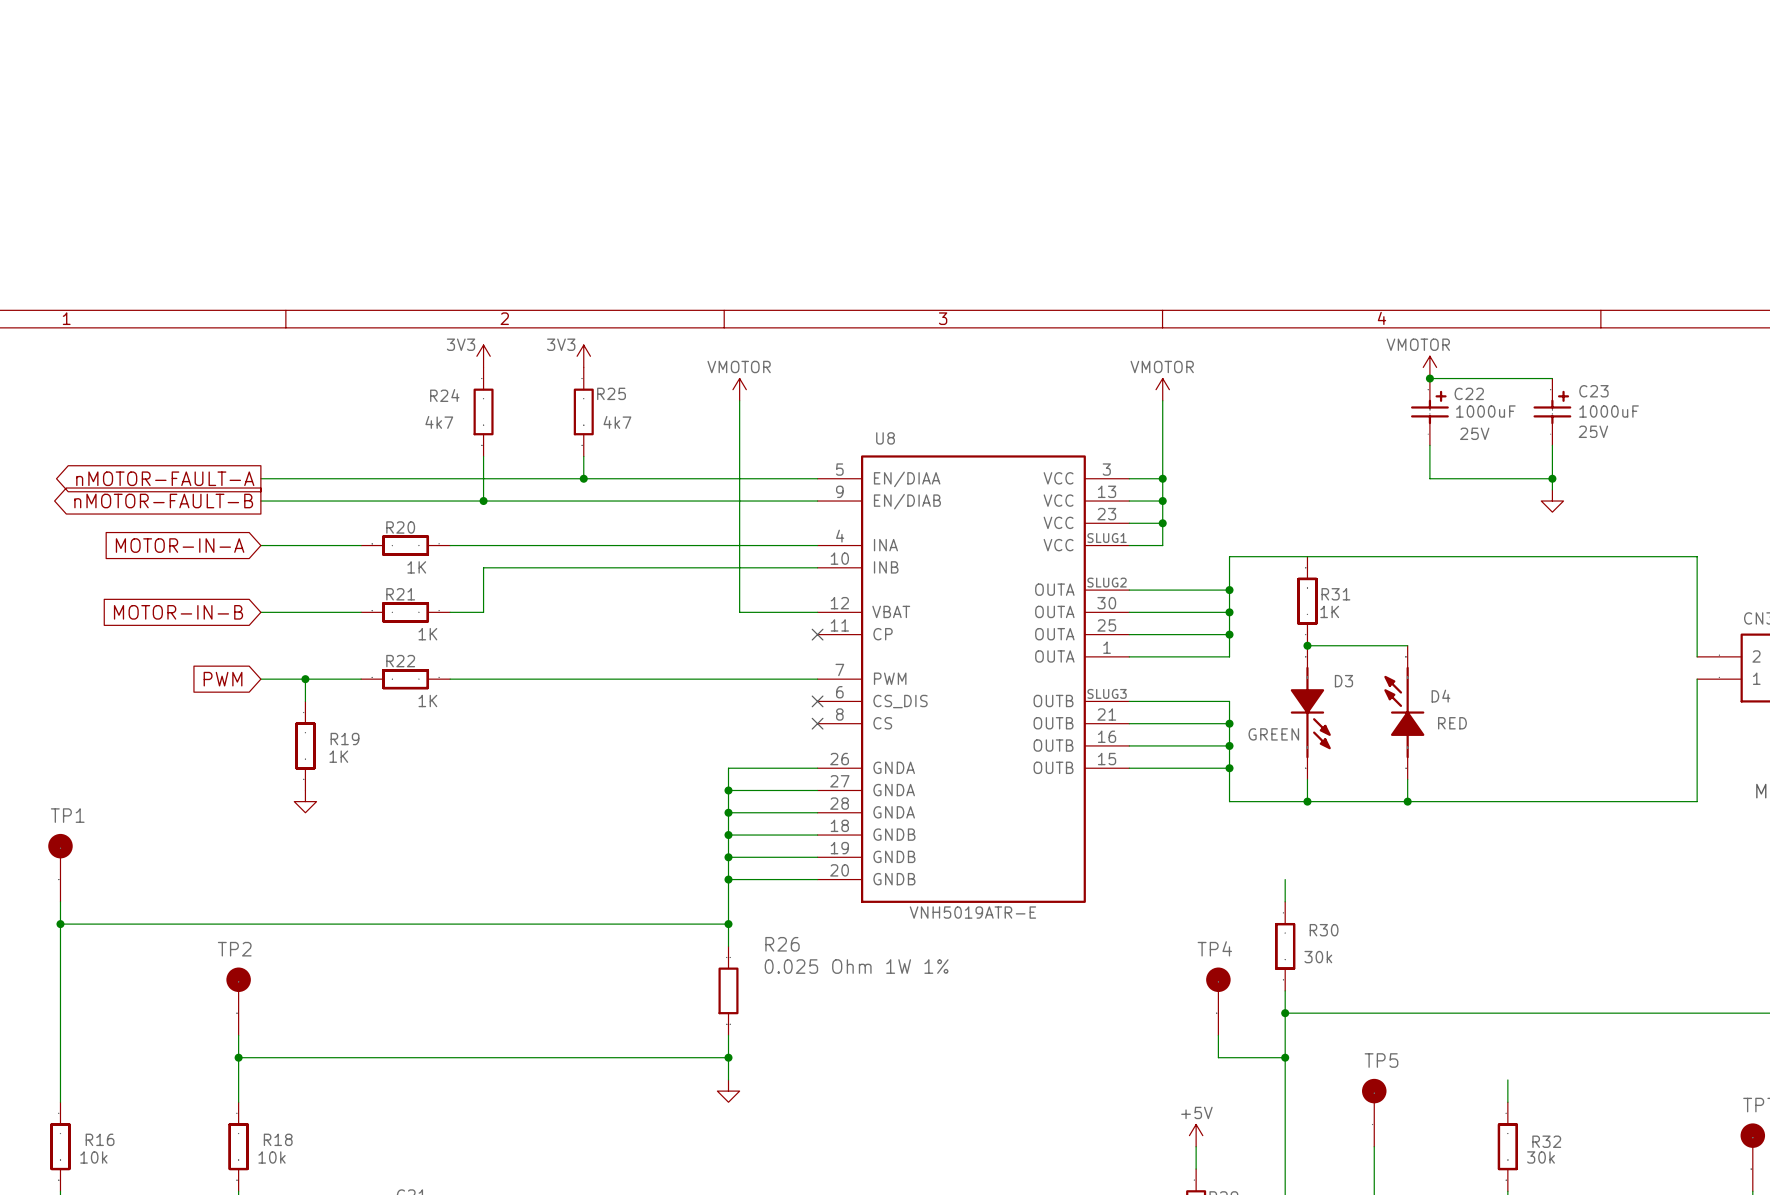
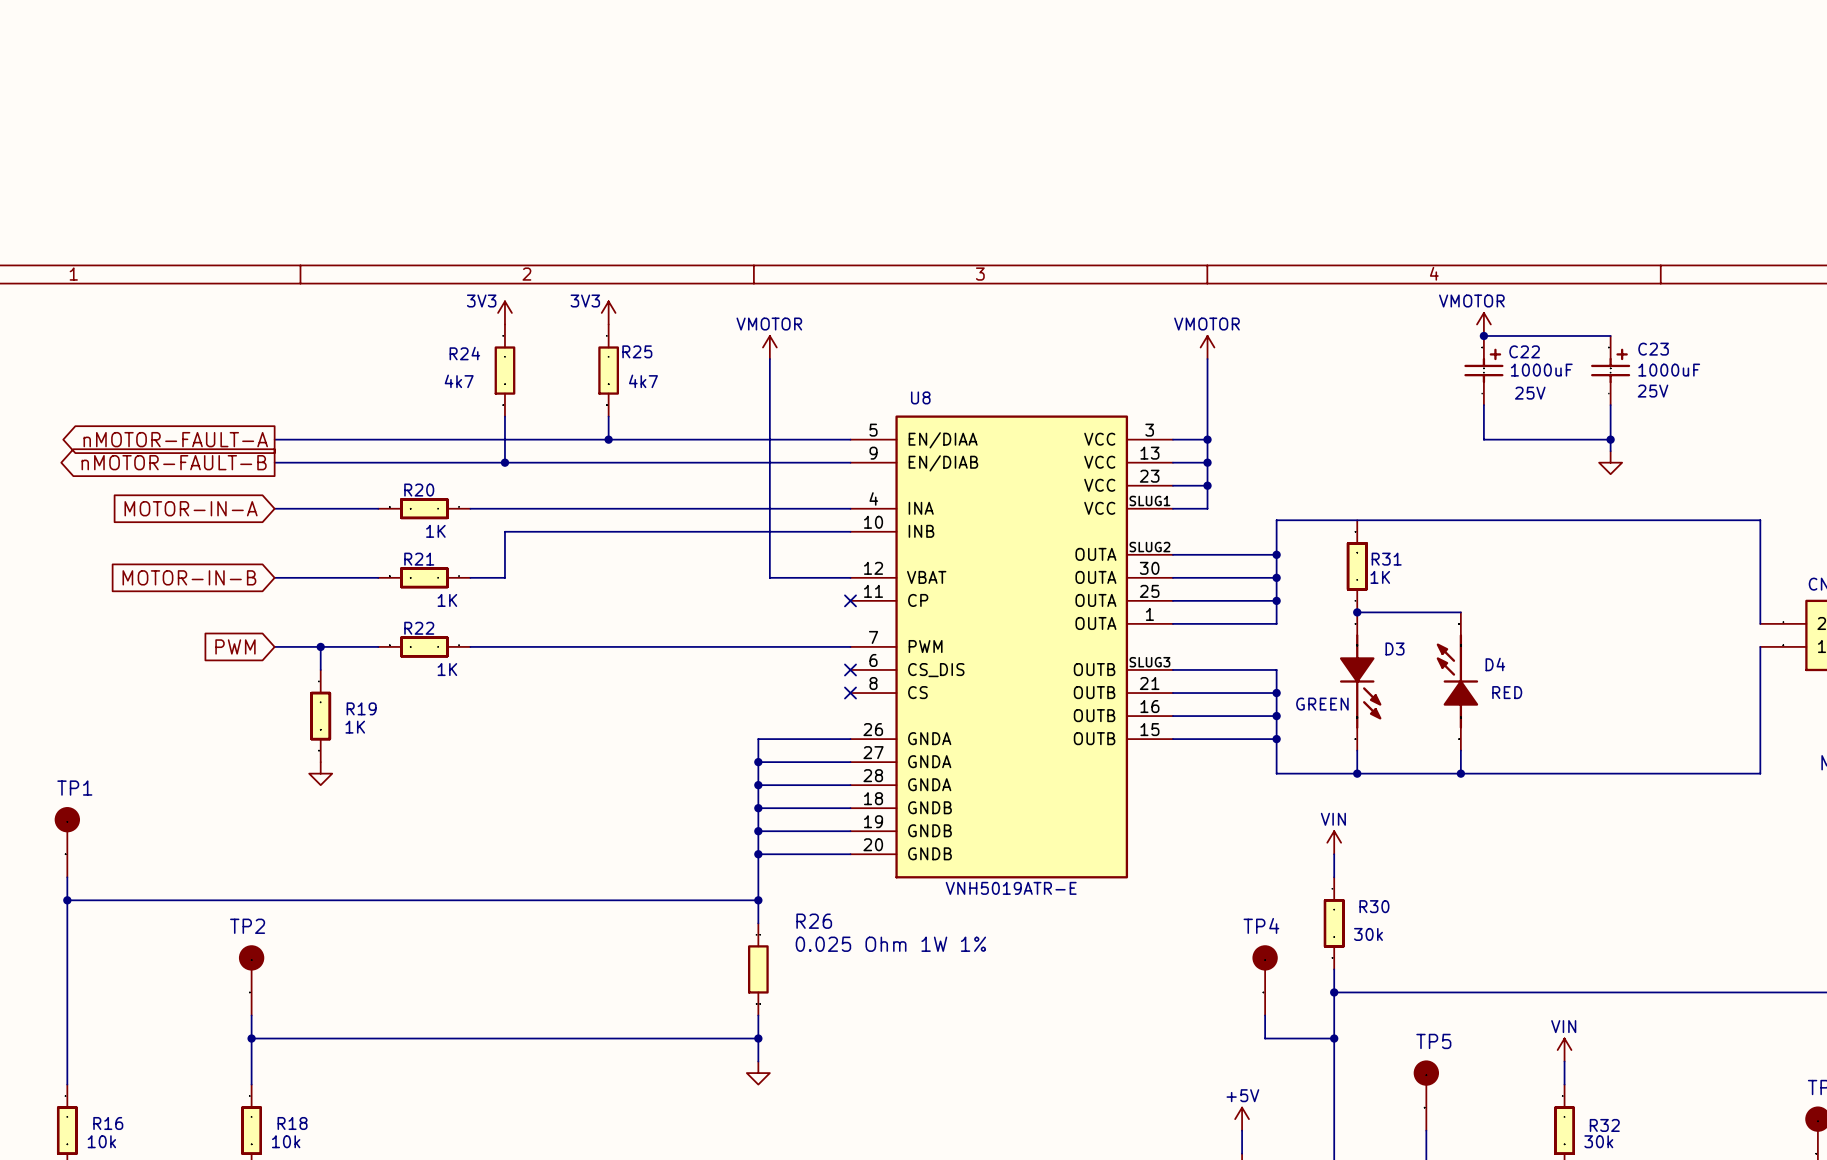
power symbol: none -> VIN (1334, 842)
power symbol: none -> VIN (1564, 1050)

